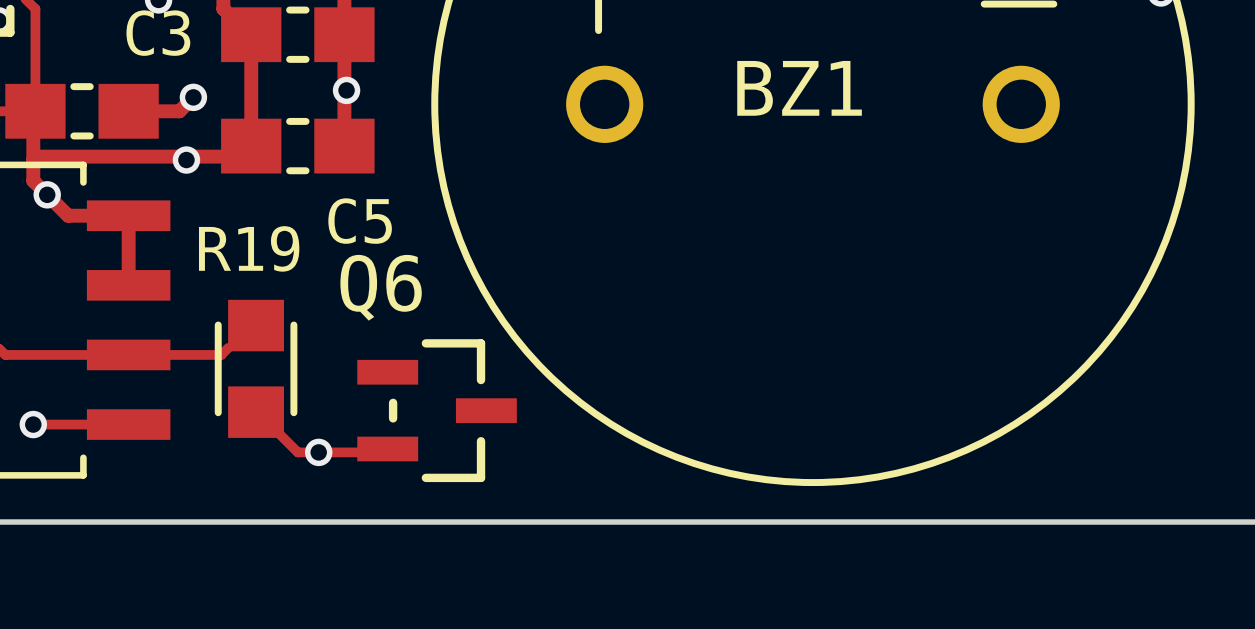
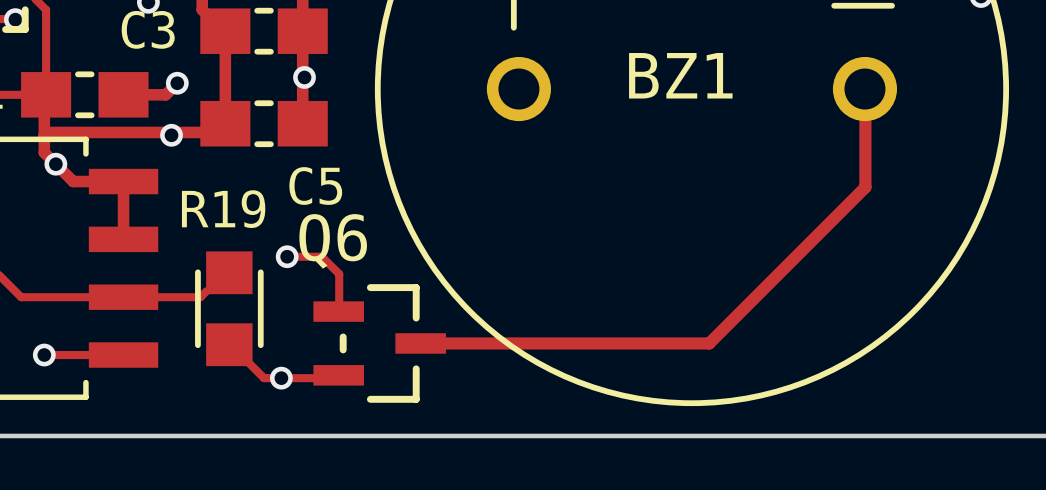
track: none -> (865, 89) (865, 187) (709, 343) (420, 343)
track: none -> (287, 256) (321, 256) (339, 274) (339, 308)
via: none -> (287, 256)

